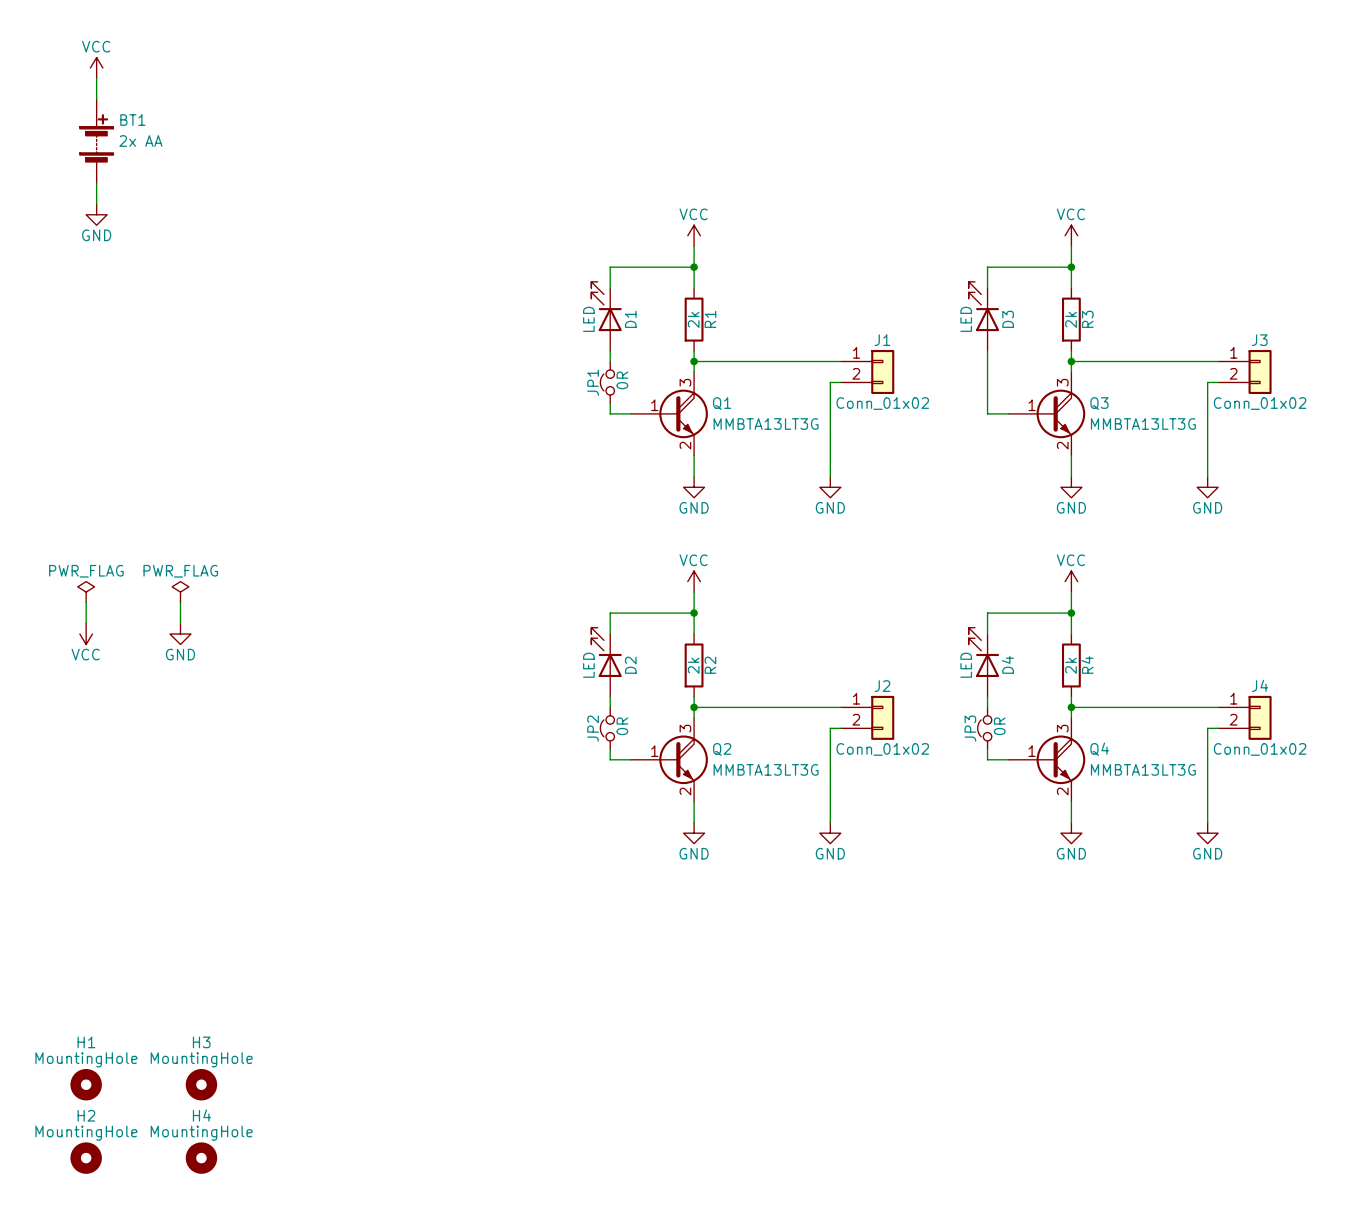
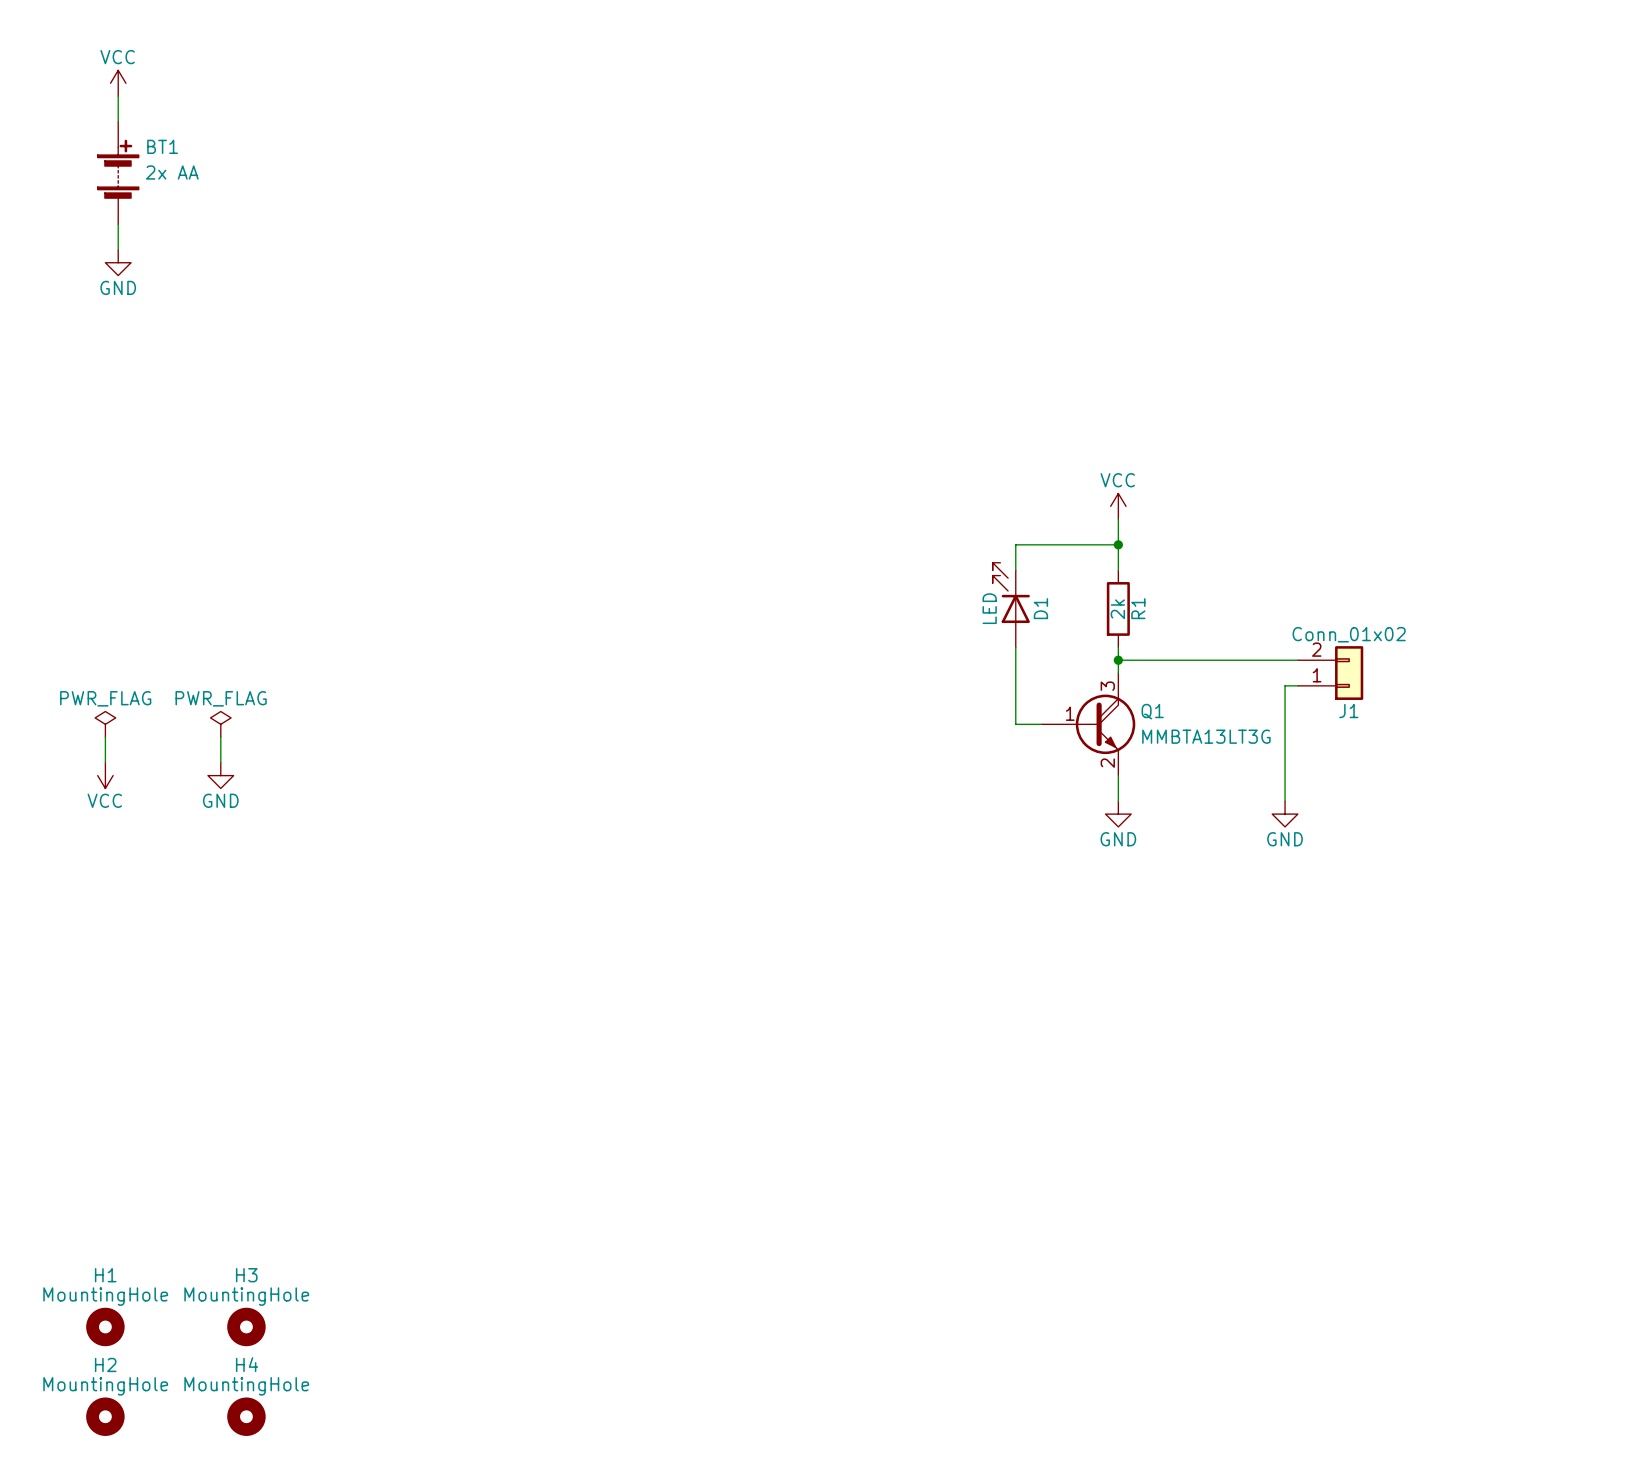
power symbol: VCC (694, 235) -> none
power symbol: VCC (1071, 235) -> none
wire: (694, 246) (694, 288) -> none
wire: (1071, 246) (1071, 288) -> none
wire: (694, 267) (610, 267) (610, 288) -> none
junction: (694, 267) -> none
wire: (1071, 267) (987, 267) (987, 288) -> none
junction: (1071, 267) -> none
D1 position: (606, 316) -> (1011, 605)
D3: LED (983, 316) -> none
R1 position: (694, 319) -> (1118, 608)
R3: 2k (1071, 319) -> none
wire: (610, 351) (610, 361) -> none
wire: (694, 351) (694, 371) -> none
wire: (987, 351) (987, 413) (1008, 413) -> none
wire: (1071, 351) (1071, 371) -> none
wire: (694, 361) (840, 361) -> none
junction: (694, 361) -> none
wire: (1071, 361) (1218, 361) -> none
junction: (1071, 361) -> none
J1 position: (867, 371) -> (1330, 673)
J1 flip: as is (882, 371) -> up-down (1349, 673)
J3: Conn_01x02 (1244, 371) -> none
JP1: 0R (607, 382) -> none
wire: (840, 382) (830, 382) (830, 445) -> (1118, 544) (1015, 544)
wire: (1218, 382) (1207, 382) (1207, 476) -> none
wire: (610, 403) (610, 413) (631, 413) -> none
Q1 position: (669, 413) -> (1088, 724)
power symbol: none -> VCC (1118, 506)
Q3: MMBTA13LT3G (1046, 413) -> none
wire: none -> (1118, 519) (1118, 570)
junction: none -> (1118, 544)
wire: (694, 455) (694, 476) -> none
wire: (1071, 455) (1071, 476) -> (1118, 647) (1118, 673)
power symbol: GND (694, 487) -> none
power symbol: GND (830, 487) -> none
power symbol: GND (1071, 487) -> none
power symbol: GND (1207, 487) -> none
wire: none -> (1015, 647) (1015, 724) (1041, 724)
wire: none -> (1118, 660) (1297, 660)
junction: none -> (1118, 660)
wire: none -> (1297, 685) (1285, 685) (1285, 801)
power symbol: VCC (694, 581) -> none
power symbol: VCC (1071, 581) -> none
wire: (694, 592) (694, 634) -> none
wire: (1071, 592) (1071, 634) -> none
wire: (694, 613) (610, 613) (610, 634) -> none
junction: (694, 613) -> none
wire: (1071, 613) (987, 613) (987, 634) -> none
junction: (1071, 613) -> none
D2: LED (606, 662) -> none
D4: LED (983, 662) -> none
R2: 2k (694, 665) -> none
power symbol: none -> GND (1118, 814)
power symbol: none -> GND (1285, 814)
R4: 2k (1071, 665) -> none
wire: (610, 696) (610, 707) -> none
wire: (694, 696) (694, 717) -> none
wire: (987, 696) (987, 707) -> none
wire: (1071, 696) (1071, 717) -> (1118, 775) (1118, 801)
wire: (694, 707) (840, 707) -> none
junction: (694, 707) -> none
wire: (1071, 707) (1218, 707) -> none
junction: (1071, 707) -> none
J2: Conn_01x02 (867, 717) -> none
J4: Conn_01x02 (1244, 717) -> none
JP2: 0R (607, 728) -> none
wire: (840, 728) (830, 728) (830, 822) -> none
JP3: 0R (984, 728) -> none
wire: (1218, 728) (1207, 728) (1207, 822) -> none
wire: (610, 749) (610, 759) (631, 759) -> none
wire: (987, 749) (987, 759) (1008, 759) -> none
Q2: MMBTA13LT3G (669, 759) -> none
Q4: MMBTA13LT3G (1046, 759) -> none
wire: (694, 801) (694, 822) -> none
wire: (1071, 801) (1071, 822) -> none
power symbol: GND (694, 833) -> none
power symbol: GND (830, 833) -> none
power symbol: GND (1071, 833) -> none
power symbol: GND (1207, 833) -> none

